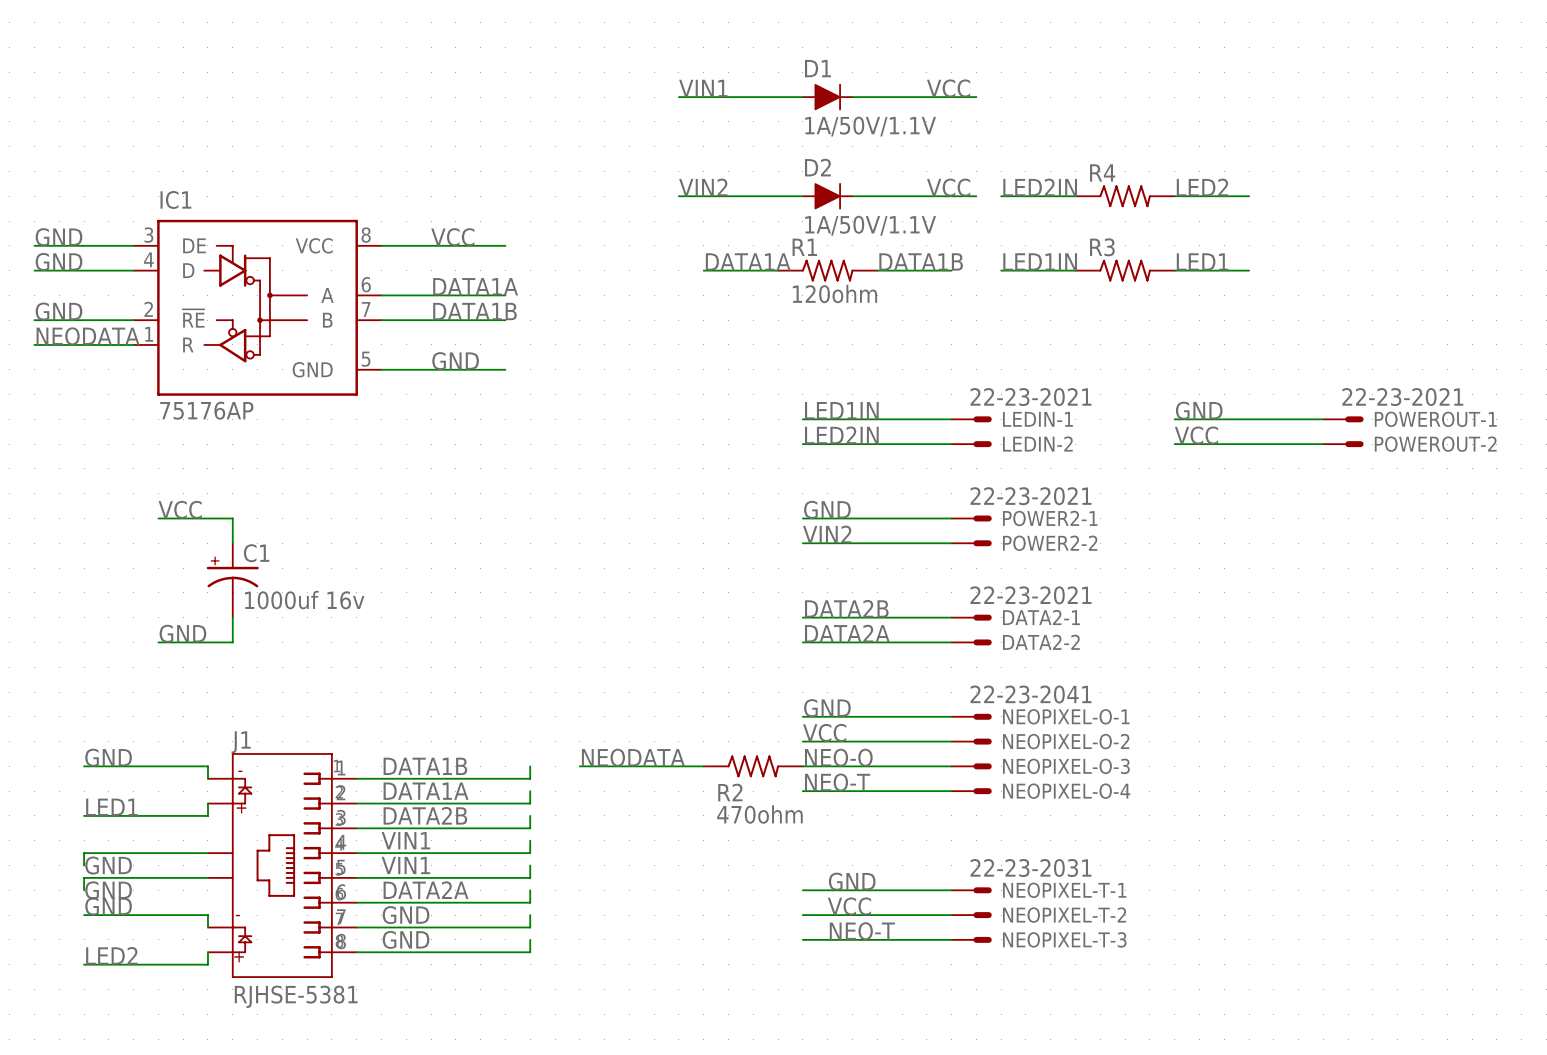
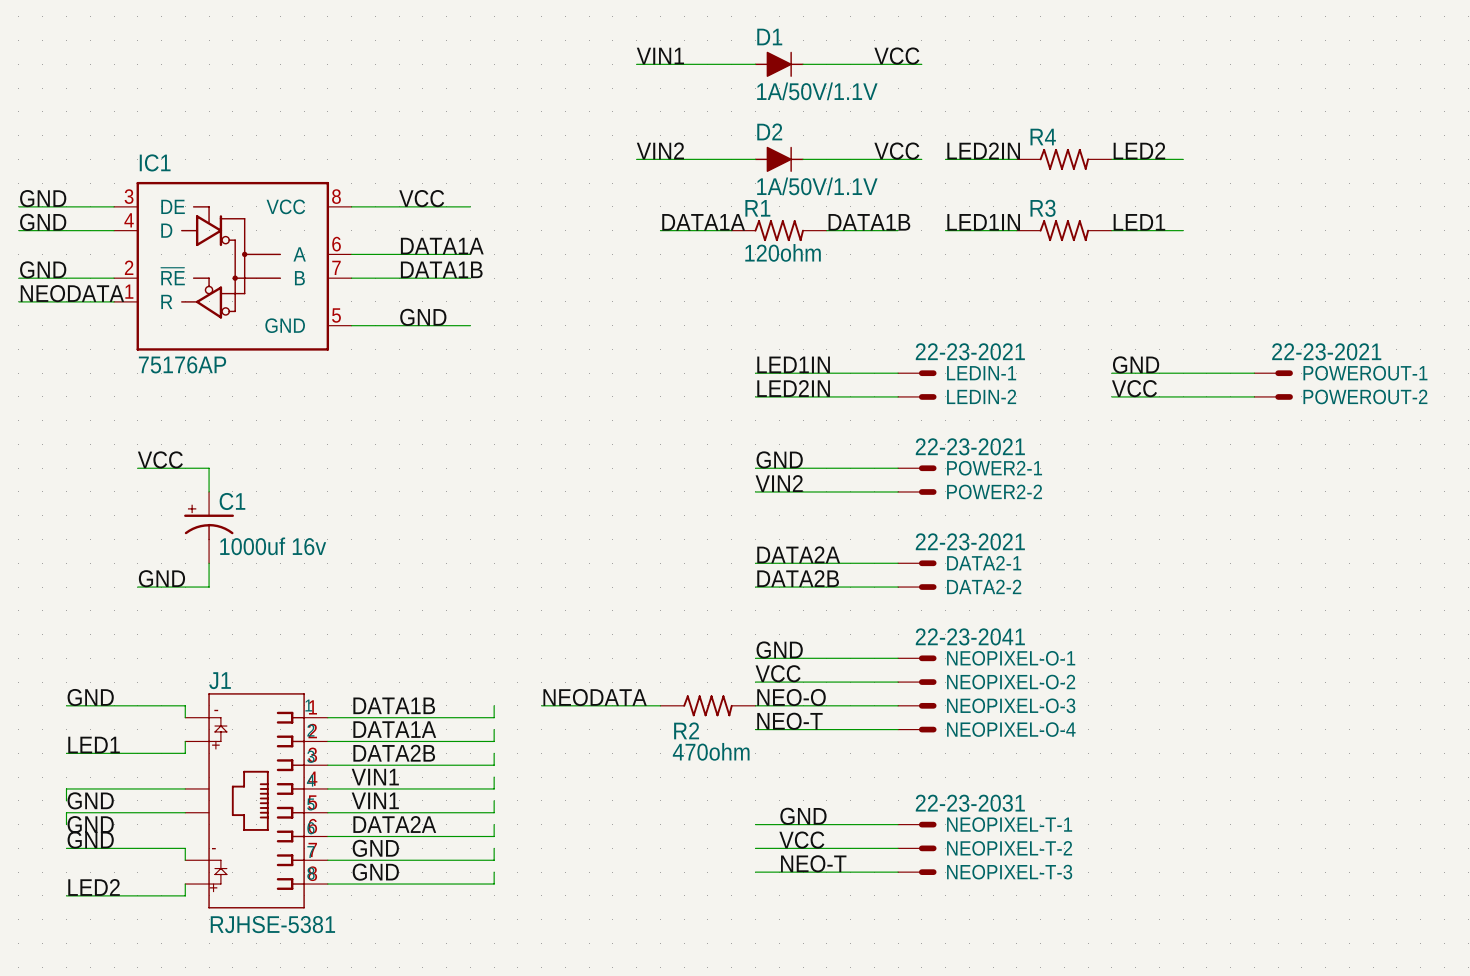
label: DATA2B (846, 608) -> DATA2A (798, 554)
label: DATA2A (847, 633) -> DATA2B (798, 578)

